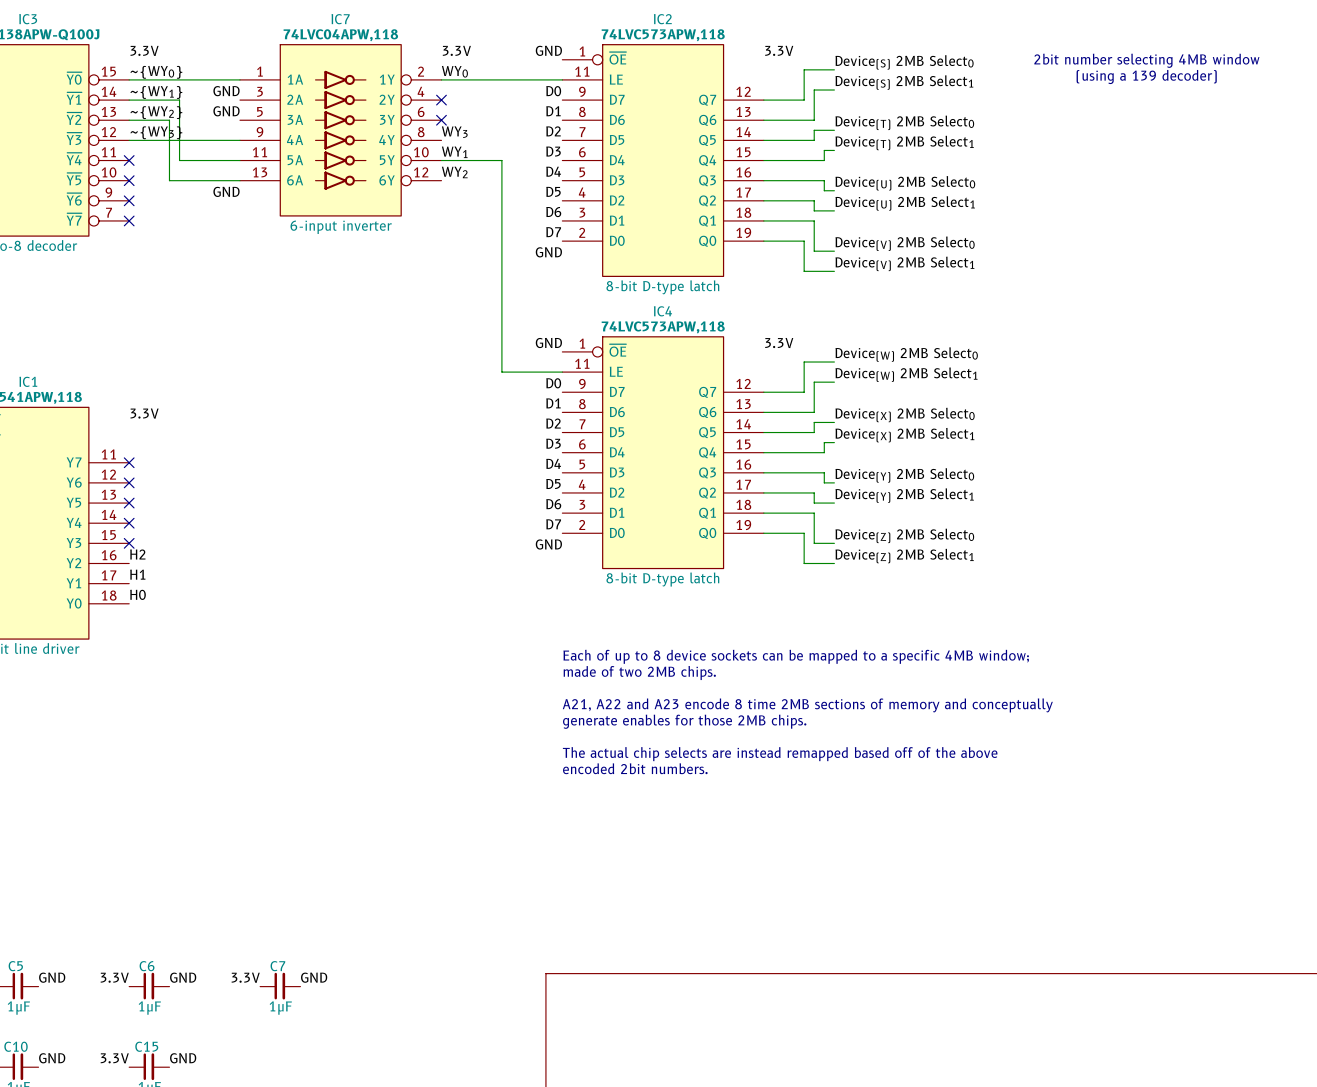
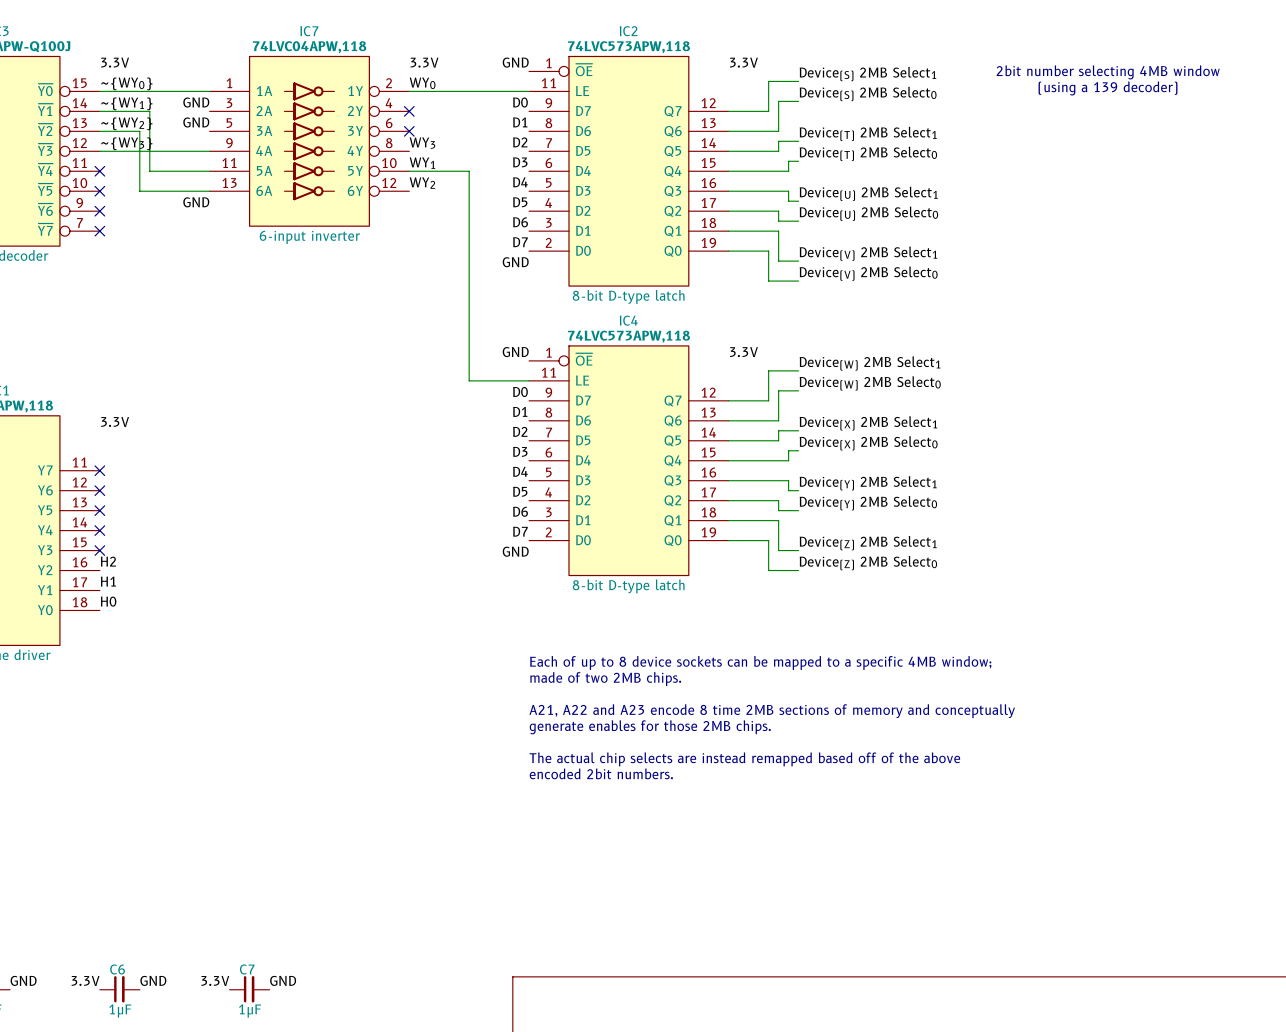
label: Device(S) 2MB Select0 (904, 62) -> Device(S) 2MB Select1 (867, 74)
label: Device(S) 2MB Select1 (904, 82) -> Device(S) 2MB Select0 (868, 94)
label: Device(T) 2MB Select0 (904, 122) -> Device(T) 2MB Select1 (868, 133)
label: Device(T) 2MB Select1 (904, 143) -> Device(T) 2MB Select0 (868, 153)
label: Device(U) 2MB Select0 (905, 183) -> Device(U) 2MB Select1 (868, 193)
label: Device(U) 2MB Select1 (905, 203) -> Device(U) 2MB Select0 (868, 213)
label: Device(V) 2MB Select0 (905, 243) -> Device(V) 2MB Select1 (868, 253)
label: Device(V) 2MB Select1 (904, 263) -> Device(V) 2MB Select0 (868, 273)
label: Device(W) 2MB Select0 (906, 354) -> Device(W) 2MB Select1 (870, 363)
label: Device(W) 2MB Select1 (906, 374) -> Device(W) 2MB Select0 (870, 383)
label: Device(X) 2MB Select0 (905, 415) -> Device(X) 2MB Select1 (868, 423)
label: Device(X) 2MB Select1 (904, 435) -> Device(X) 2MB Select0 (868, 443)
label: Device(Y) 2MB Select0 (904, 475) -> Device(Y) 2MB Select1 (868, 483)
label: Device(Y) 2MB Select1 (904, 495) -> Device(Y) 2MB Select0 (868, 503)
label: Device(Z) 2MB Select0 (904, 535) -> Device(Z) 2MB Select1 (868, 543)
label: Device(Z) 2MB Select1 (904, 556) -> Device(Z) 2MB Select0 (868, 563)

